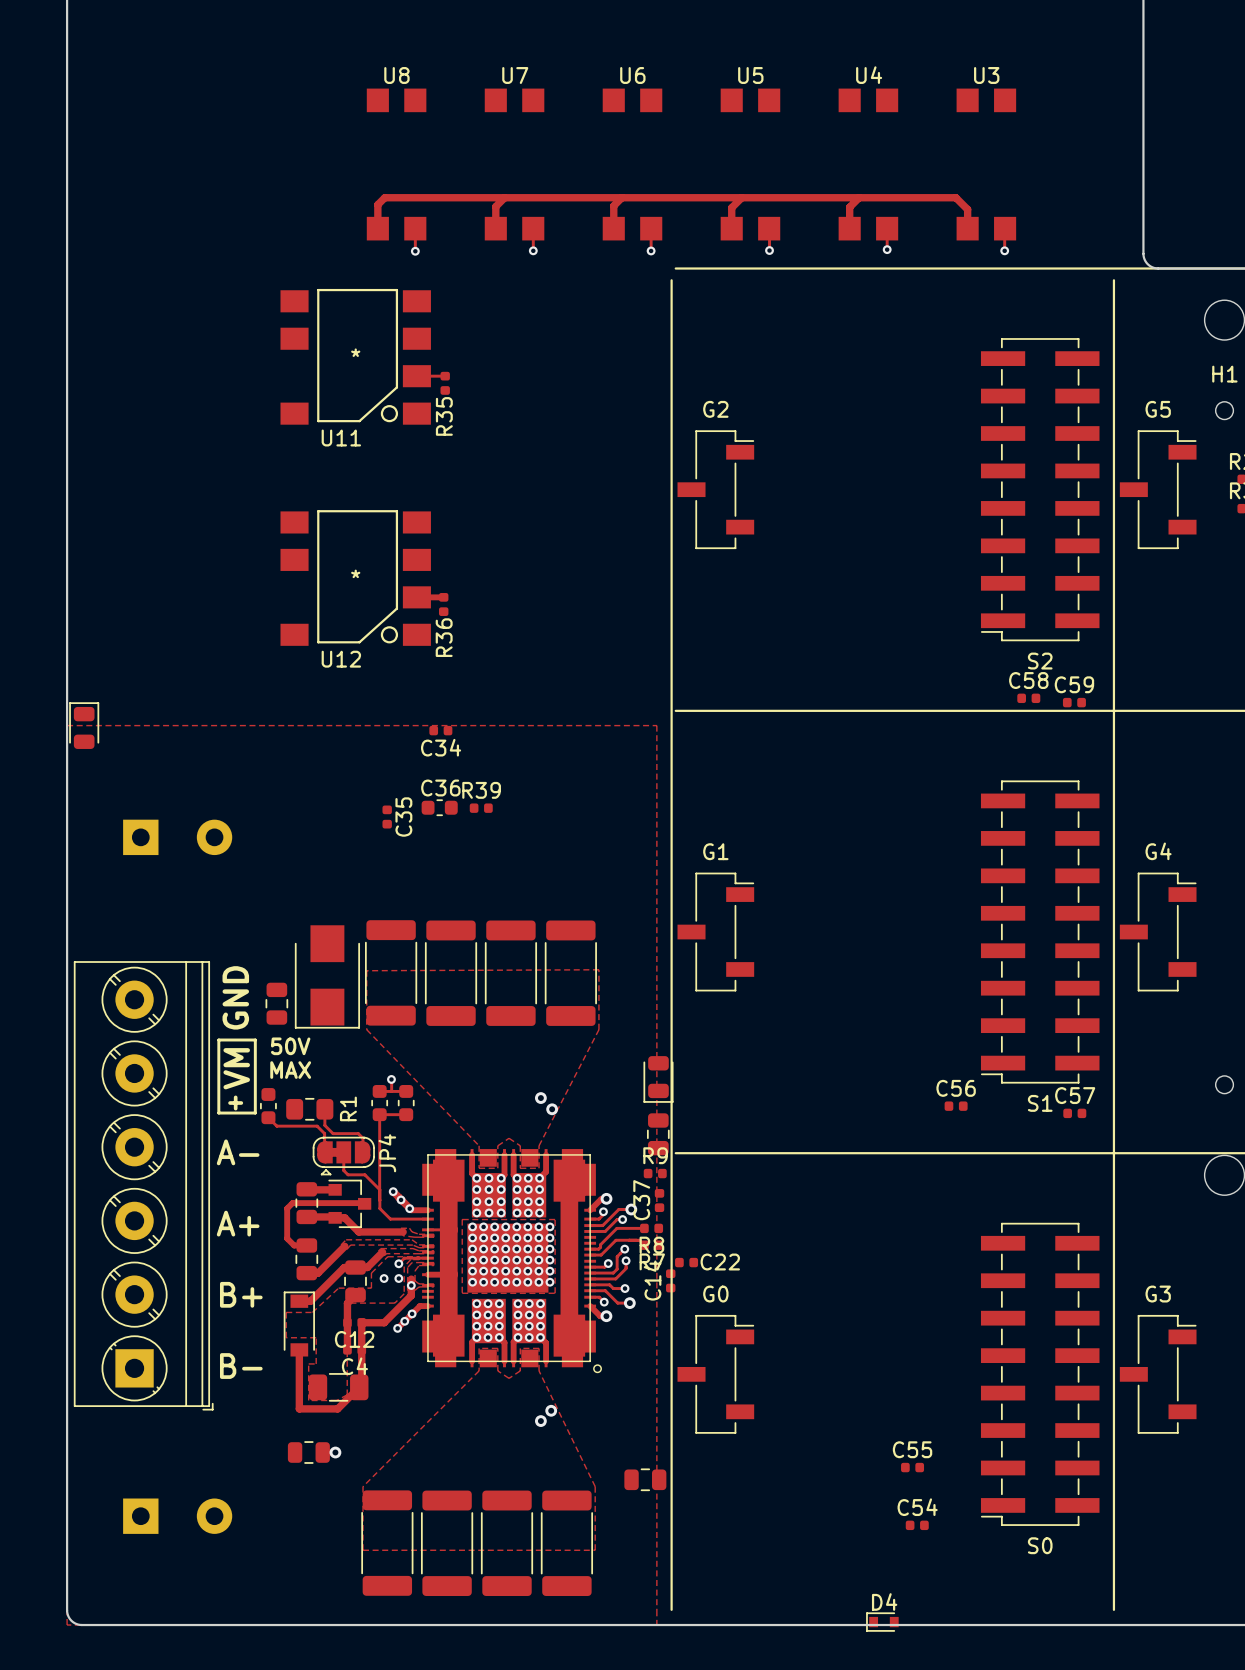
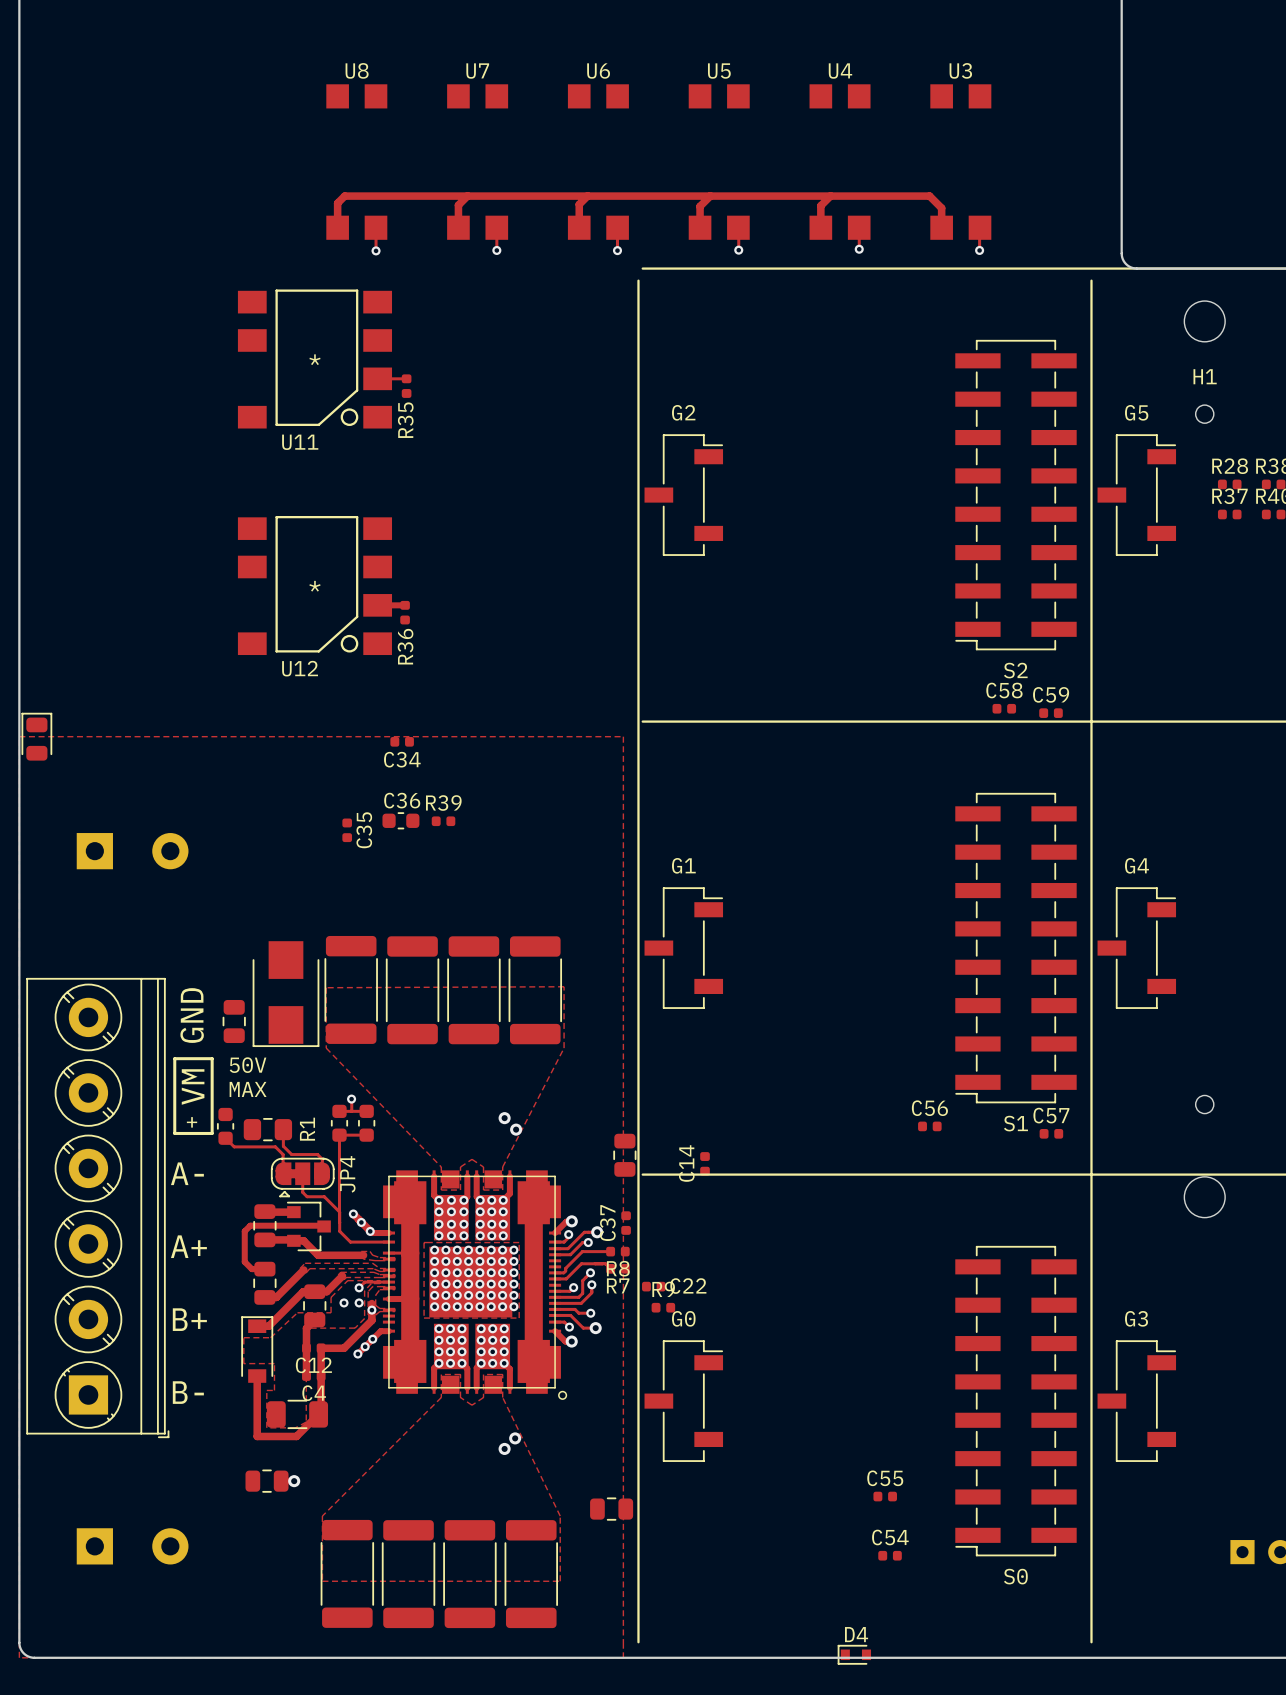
part: (658, 1079) -> none
R9 position: (655, 1173) -> (663, 1307)
C14 position: (670, 1280) -> (705, 1163)

